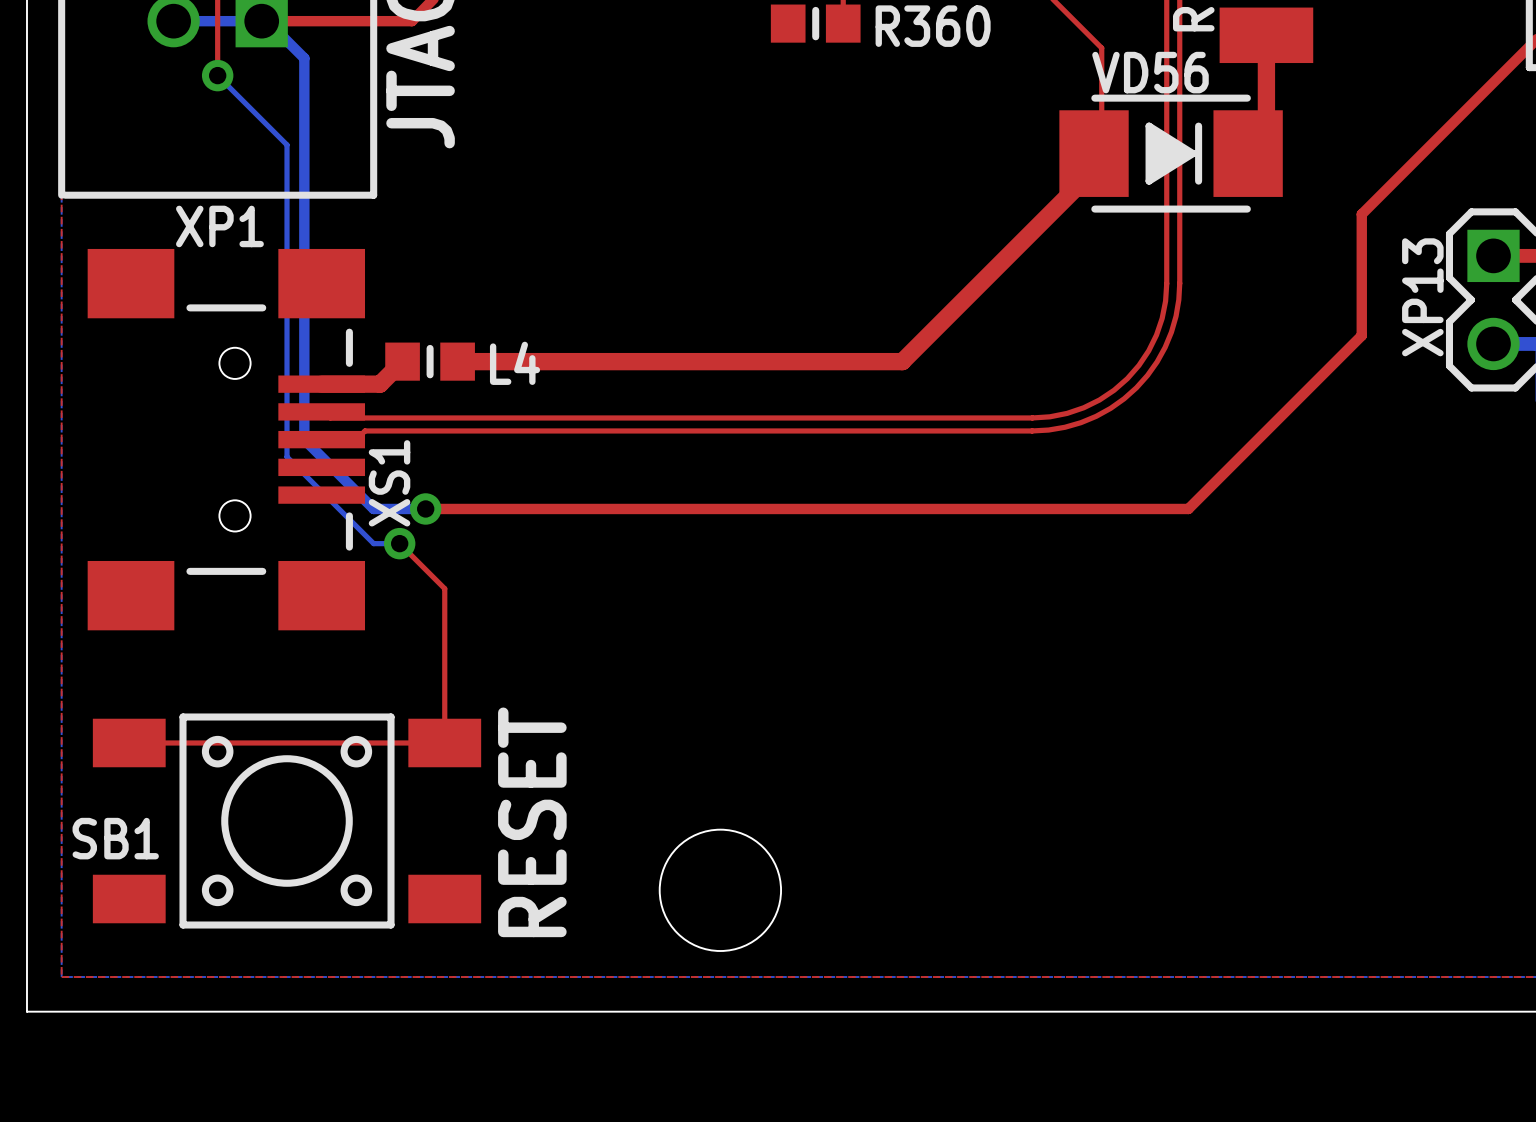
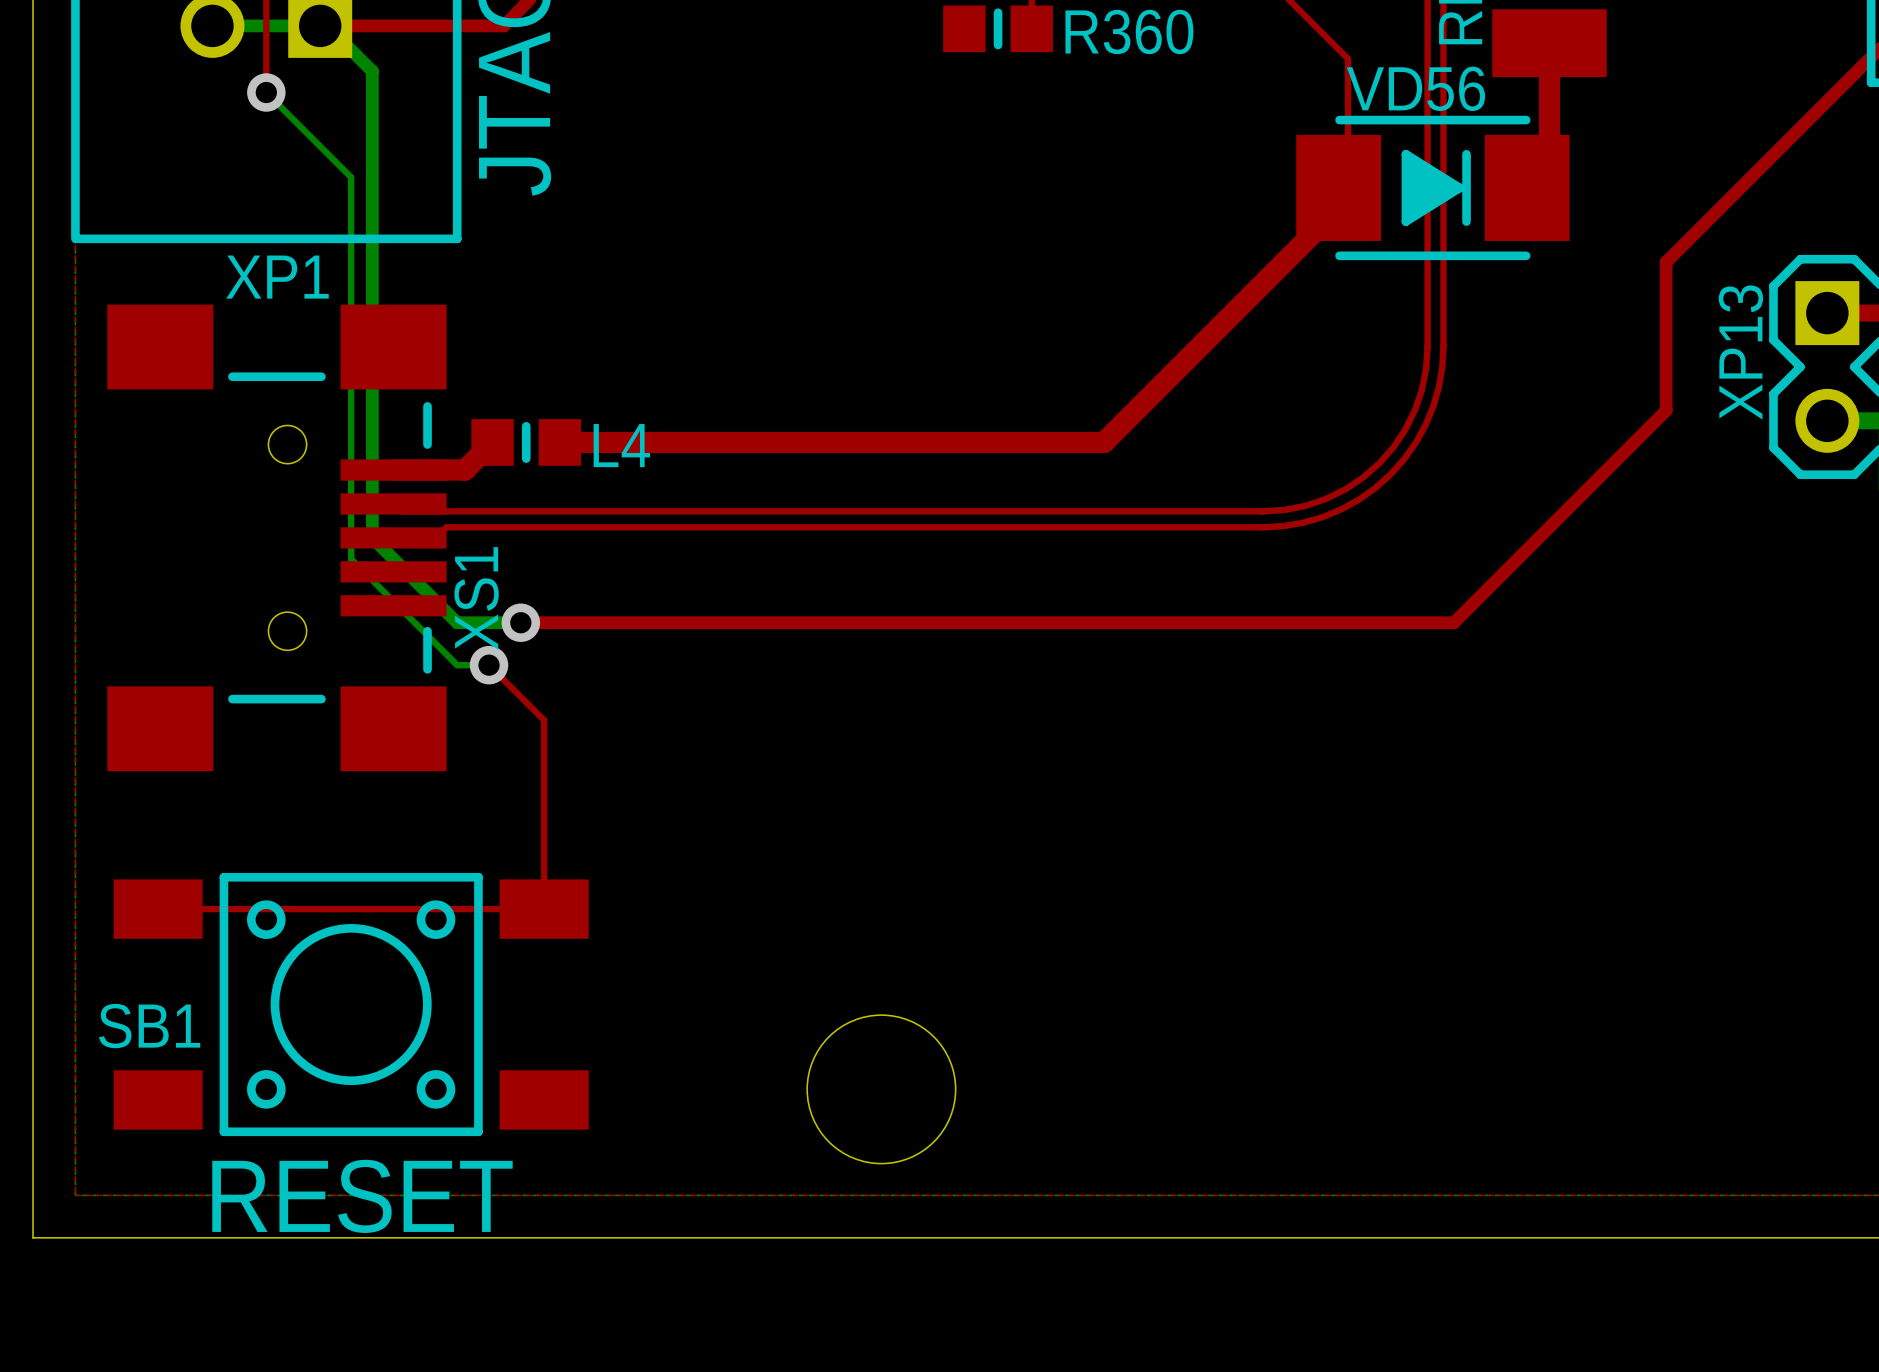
SB1 text rotation: 0° (532, 822) -> 90° clockwise (362, 1196)
SB1 text position: RESET (532, 822) -> RESET (362, 1196)

